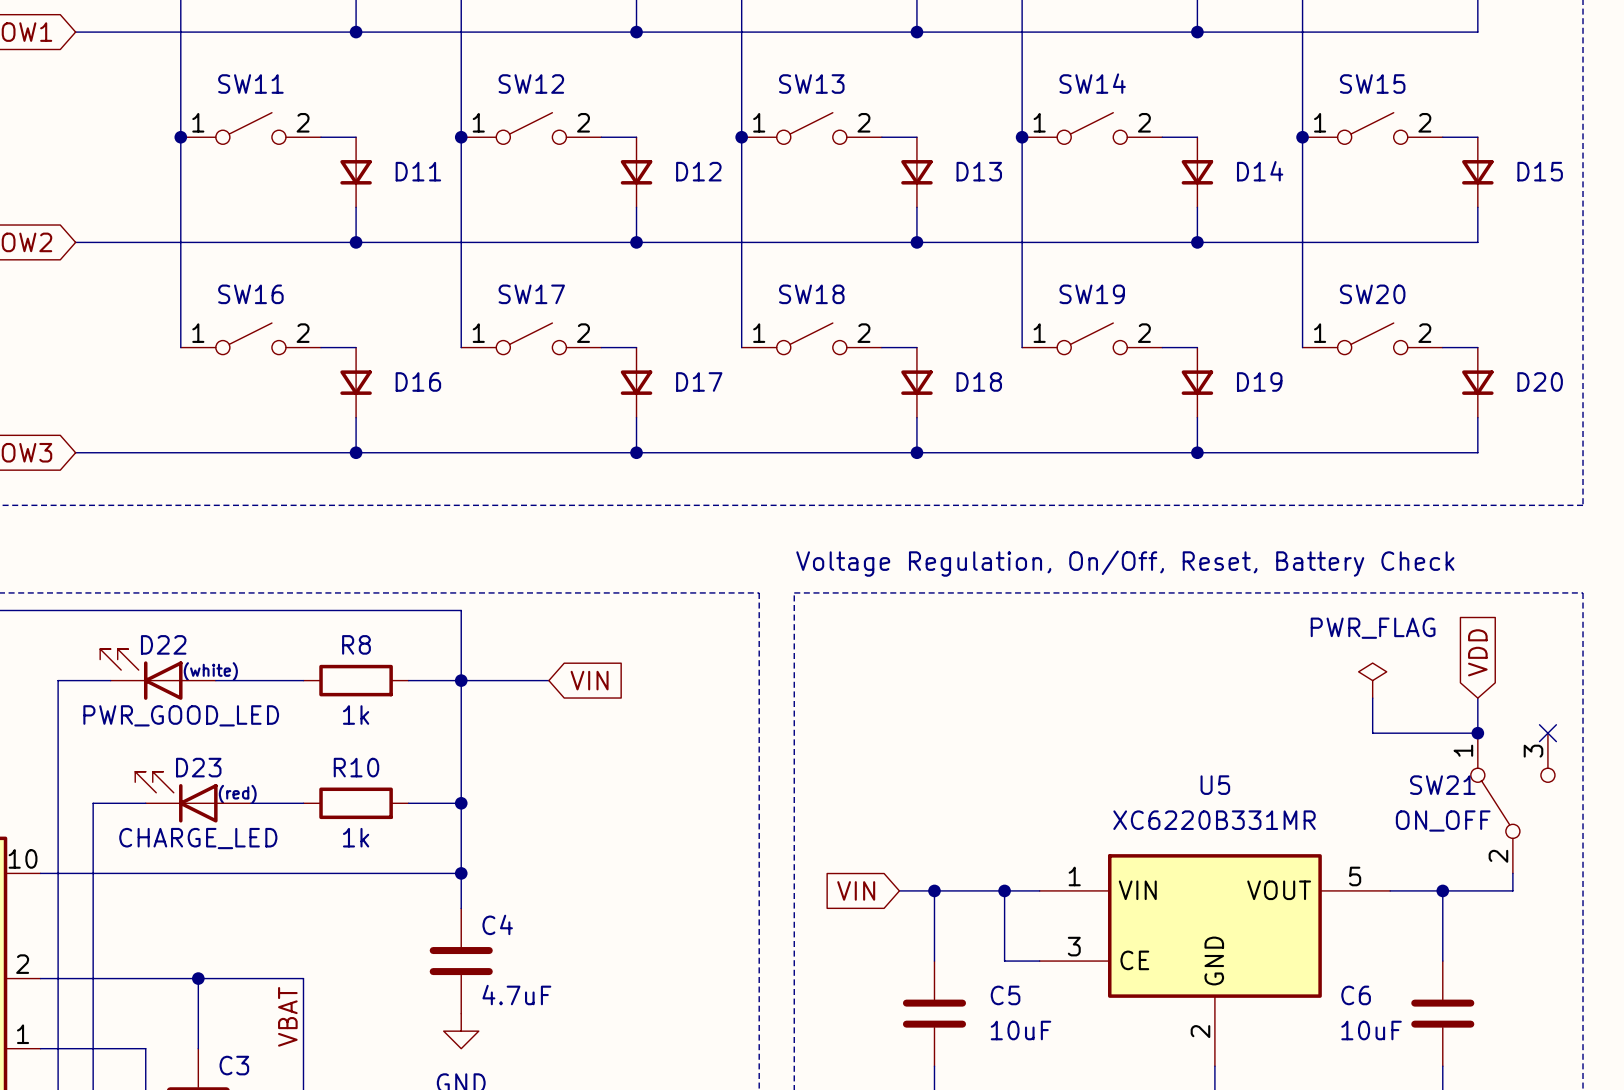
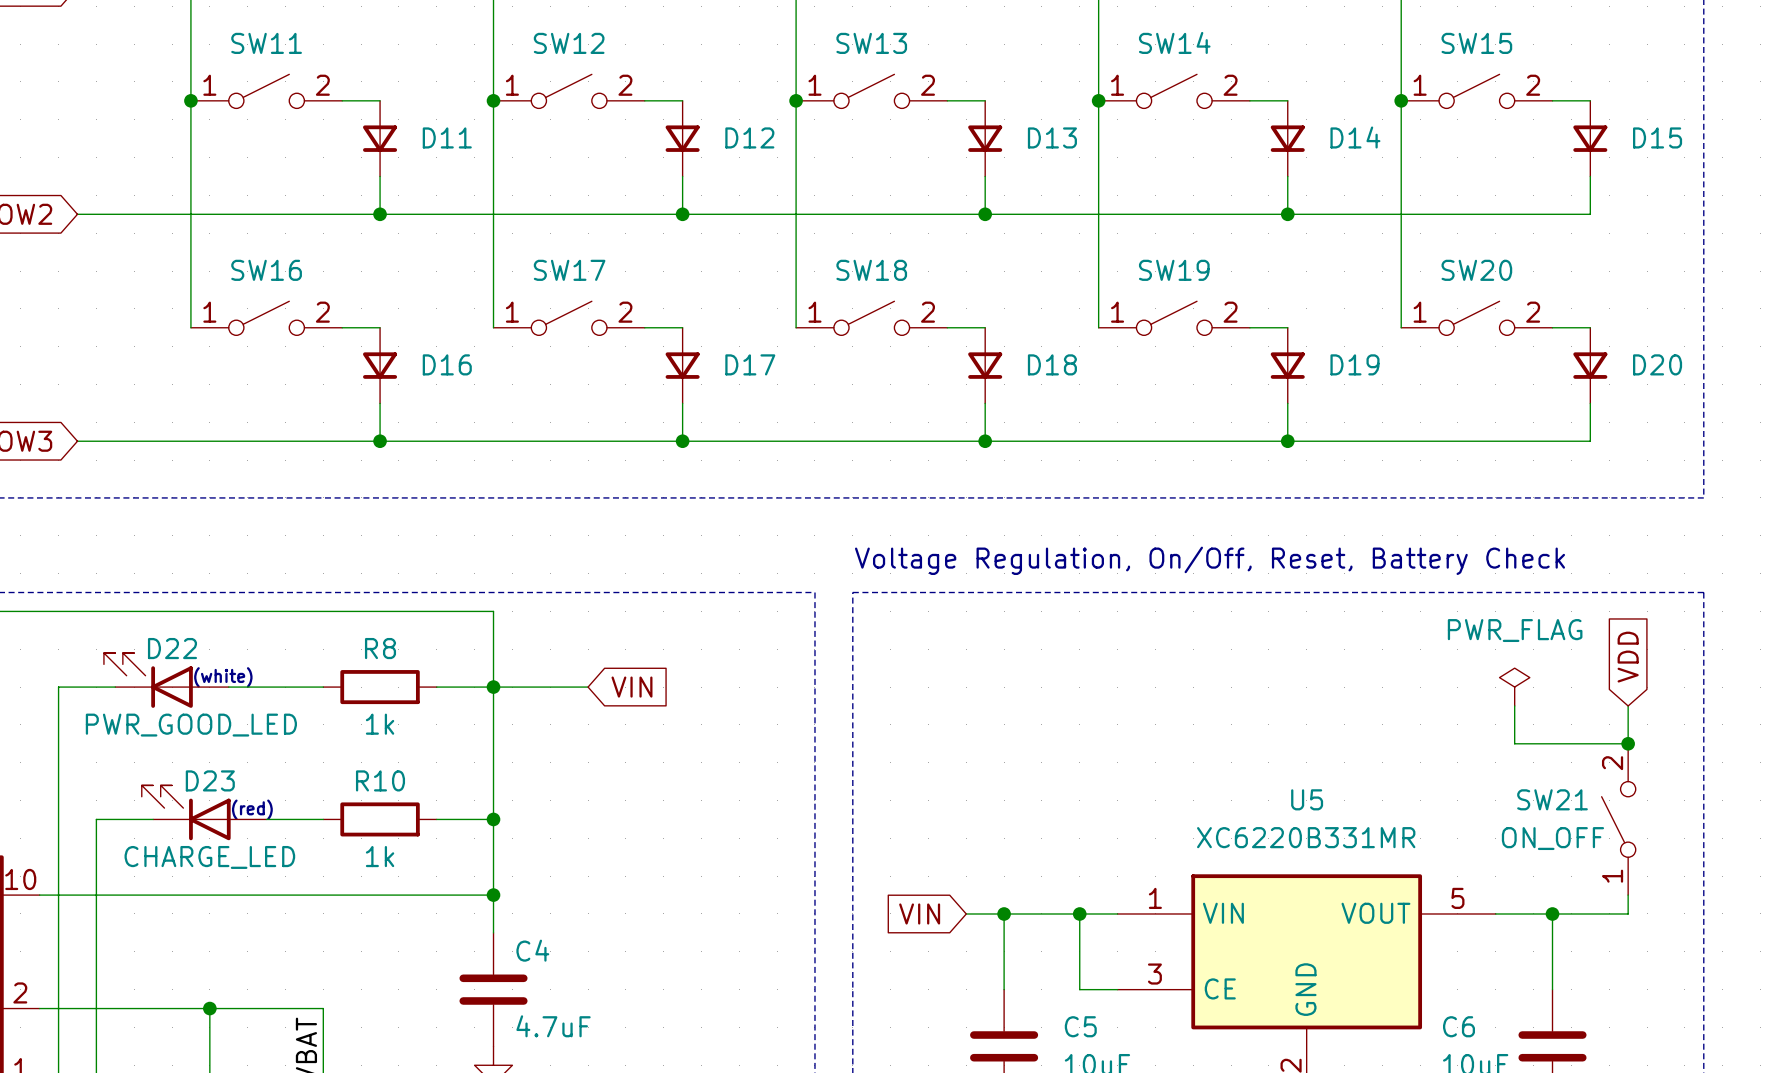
global label position: VDD (1477, 652) -> VDD (1628, 657)
power symbol position: PWR_FLAG (1372, 680) -> PWR_FLAG (1514, 687)
wire: (1372, 698) (1372, 733) (1407, 733) -> (1514, 705) (1514, 743)
wire: (1477, 698) (1477, 733) -> (1628, 705) (1628, 743) (1590, 743)
SW21 symbol: [1470, 733, 1555, 874] -> [1601, 743, 1636, 896]
junction position: (1477, 733) -> (1628, 743)
no-connect mark: (1547, 733) -> none

